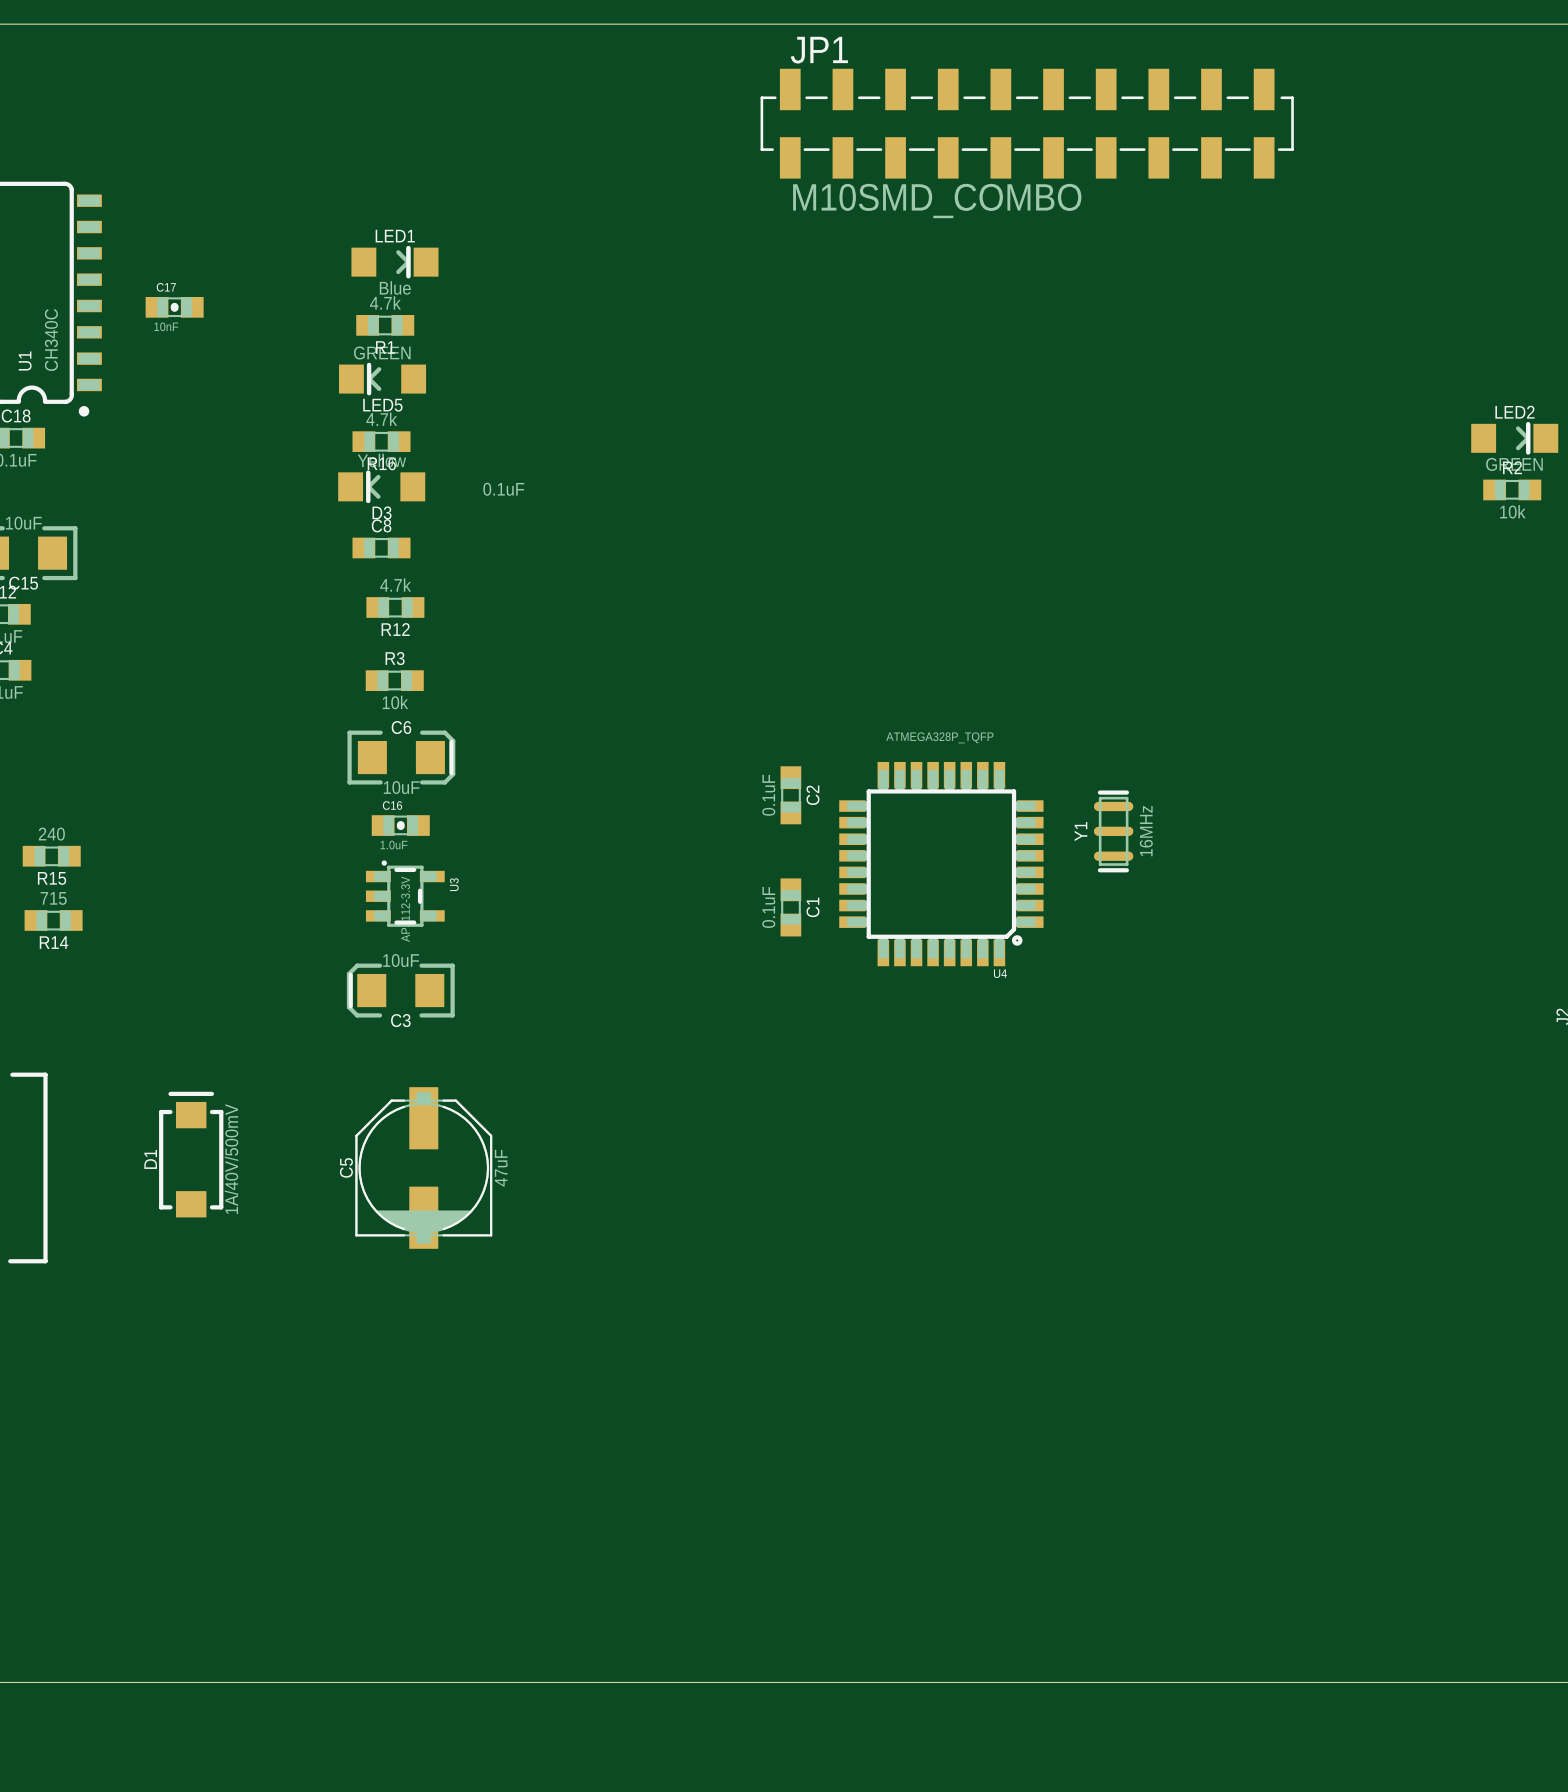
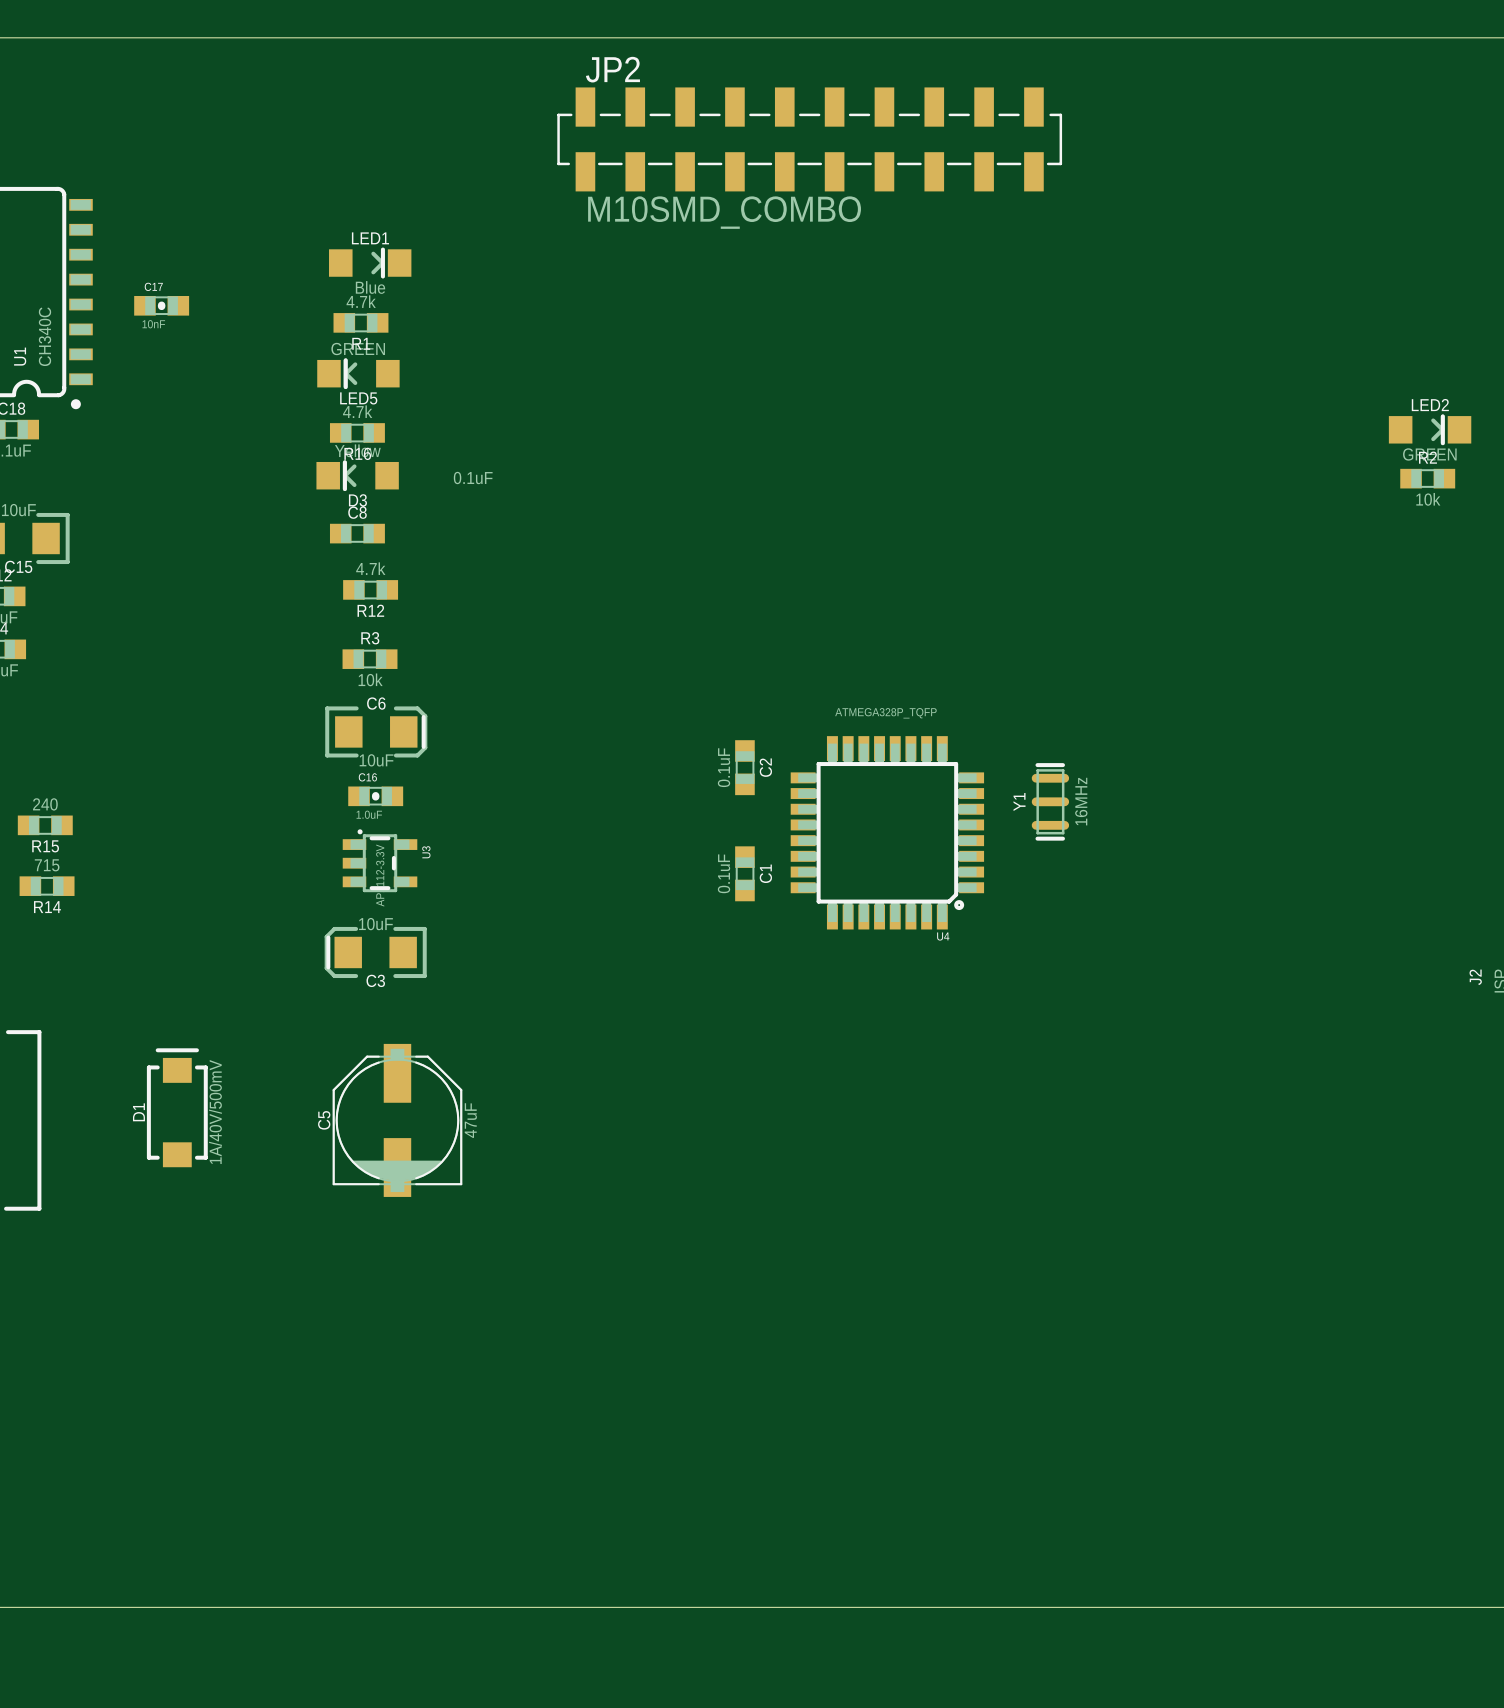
JP1: M10SMD_COMBO (1027, 123) -> none
JP2: none -> M10SMD_COMBO (809, 139)

